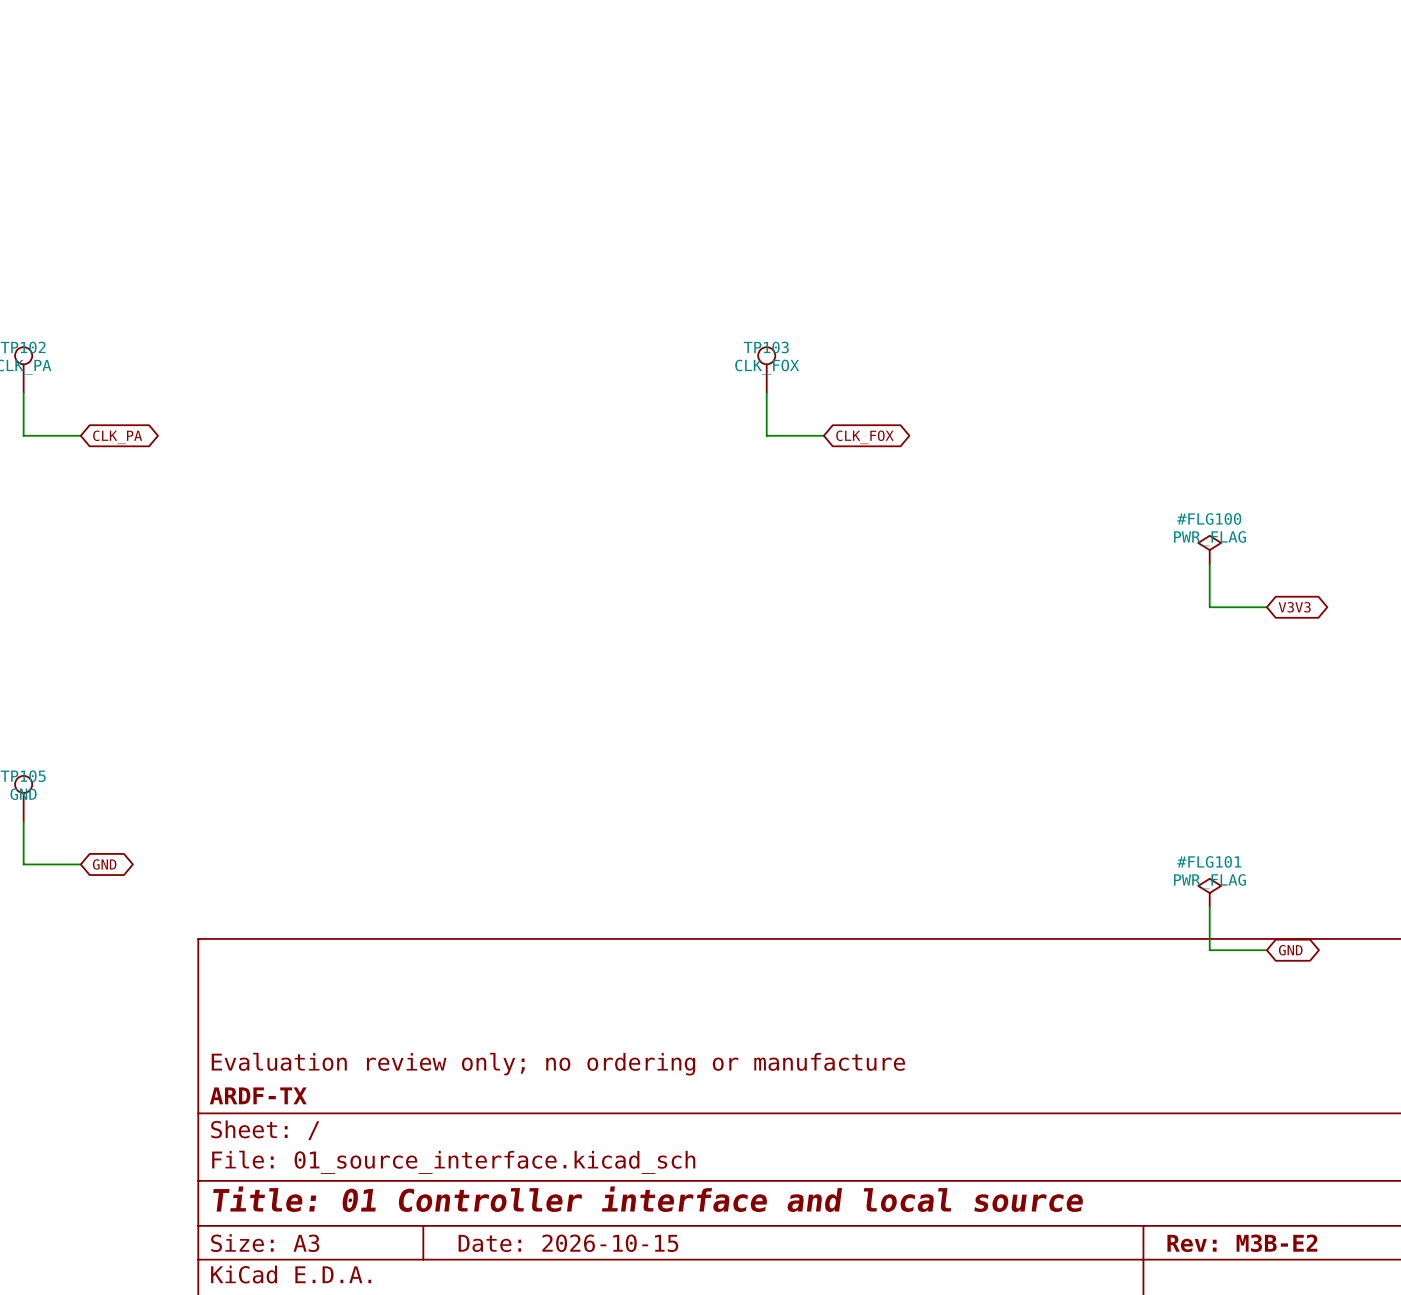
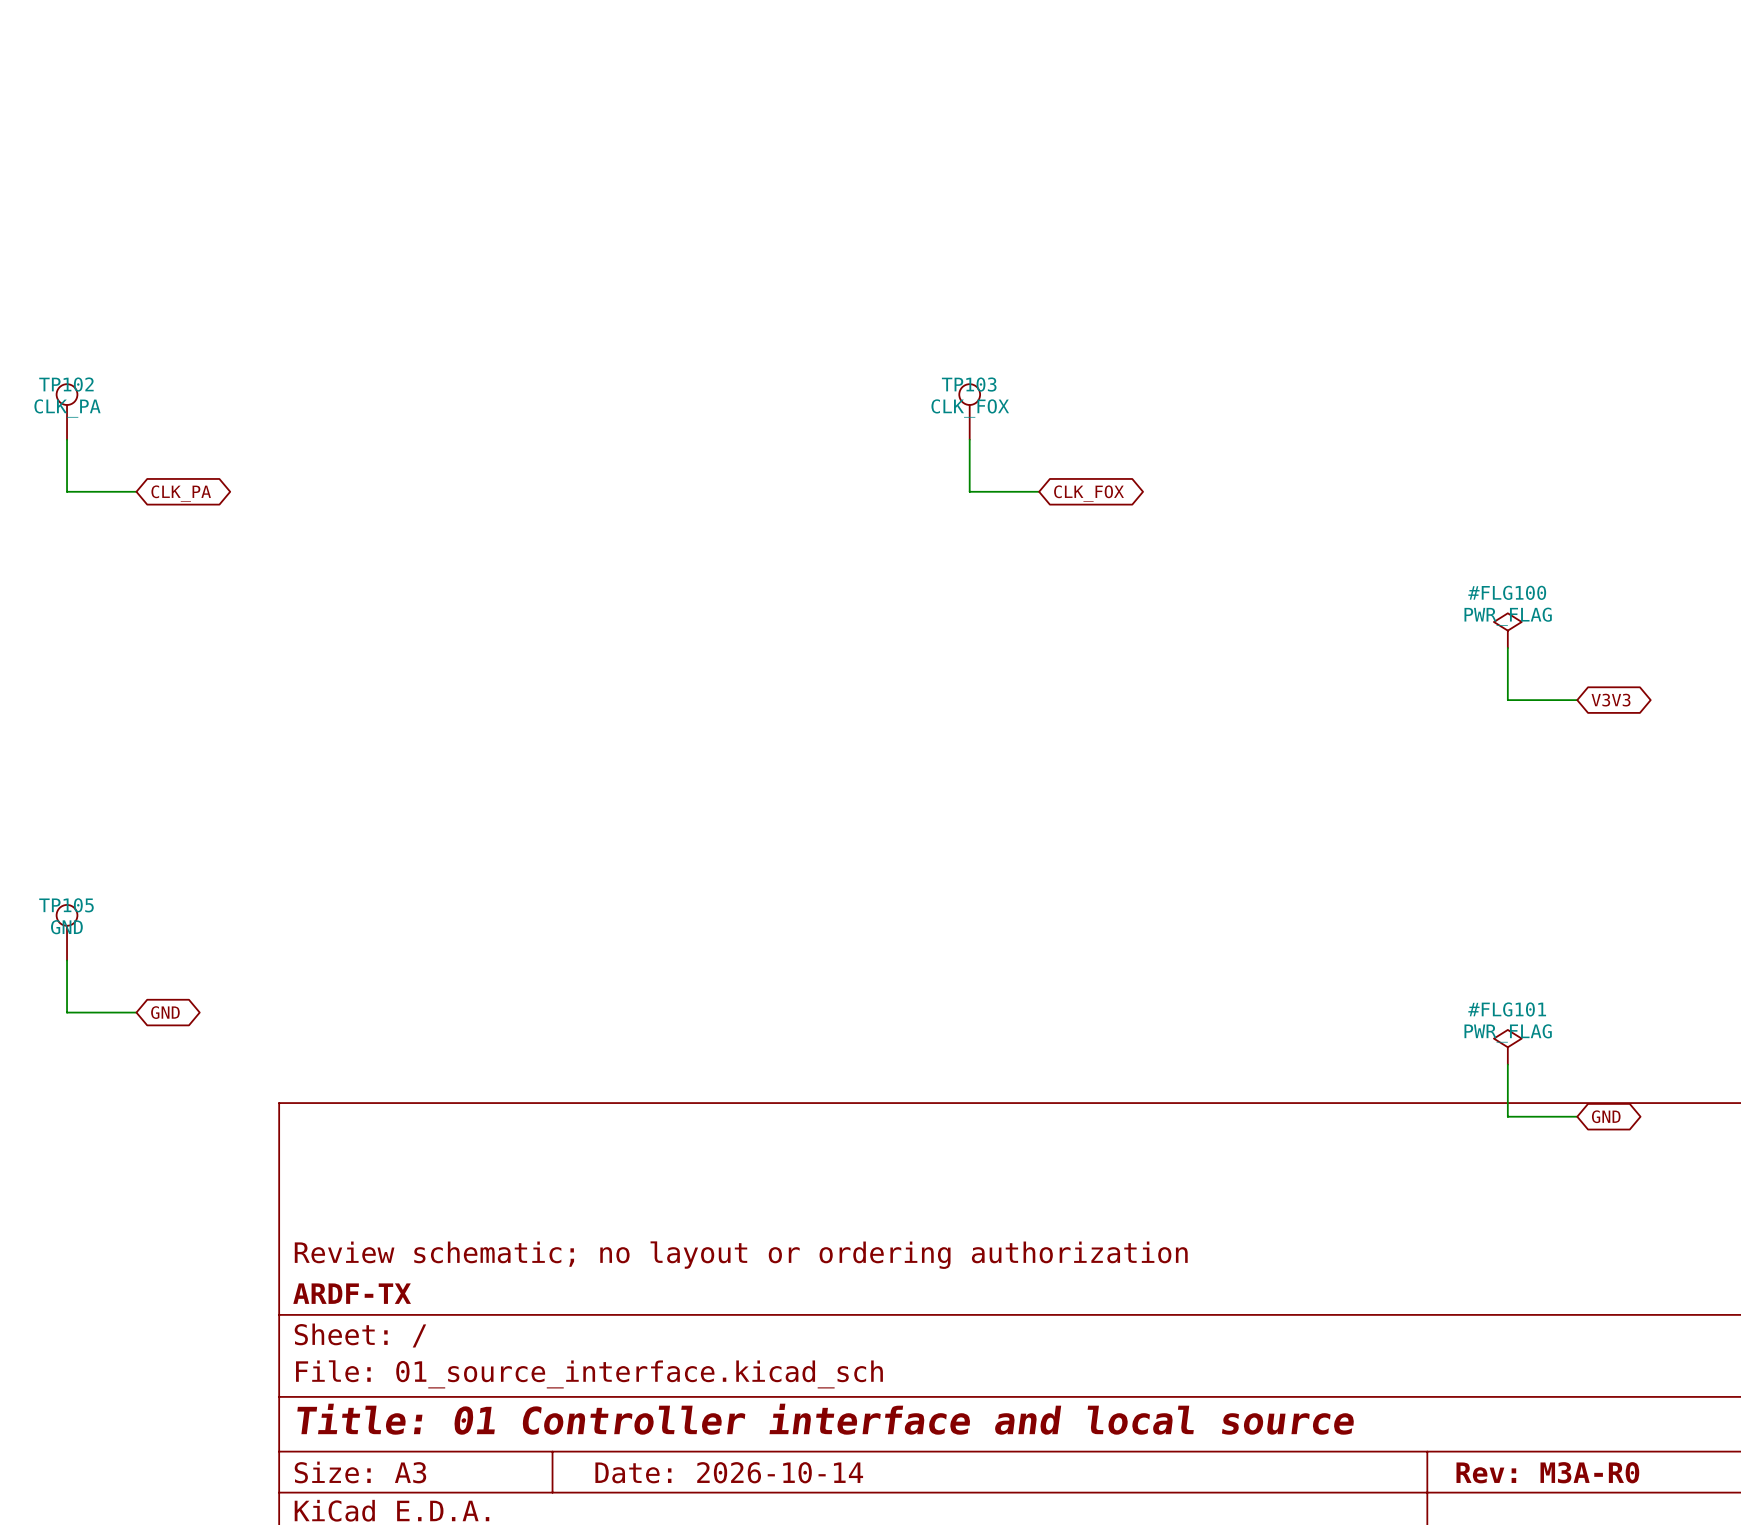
title block: Evaluation review only; no ordering or manufacture (558, 1064) -> Review schematic; no layout or ordering authorization (741, 1255)
title block: Date: 2026-10-15 (568, 1243) -> Date: 2026-10-14 (729, 1472)
title block: Rev: M3B-E2 (1242, 1243) -> Rev: M3A-R0 (1547, 1472)

